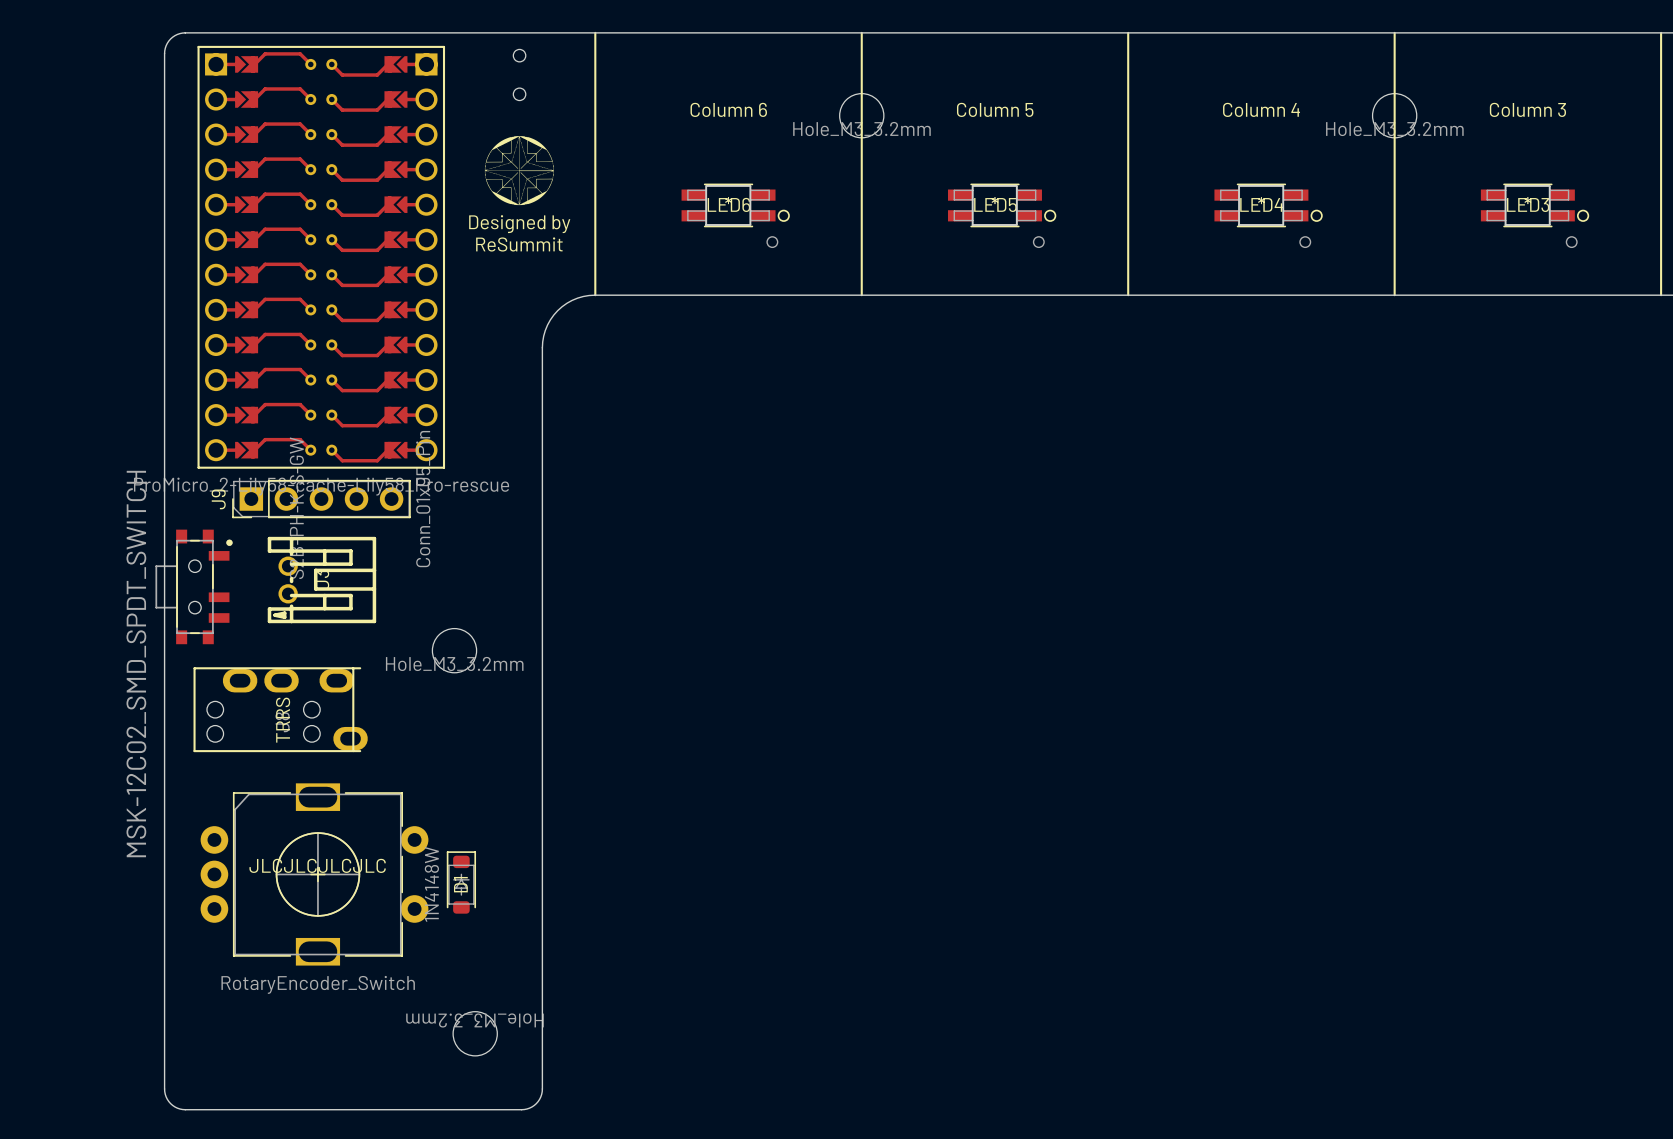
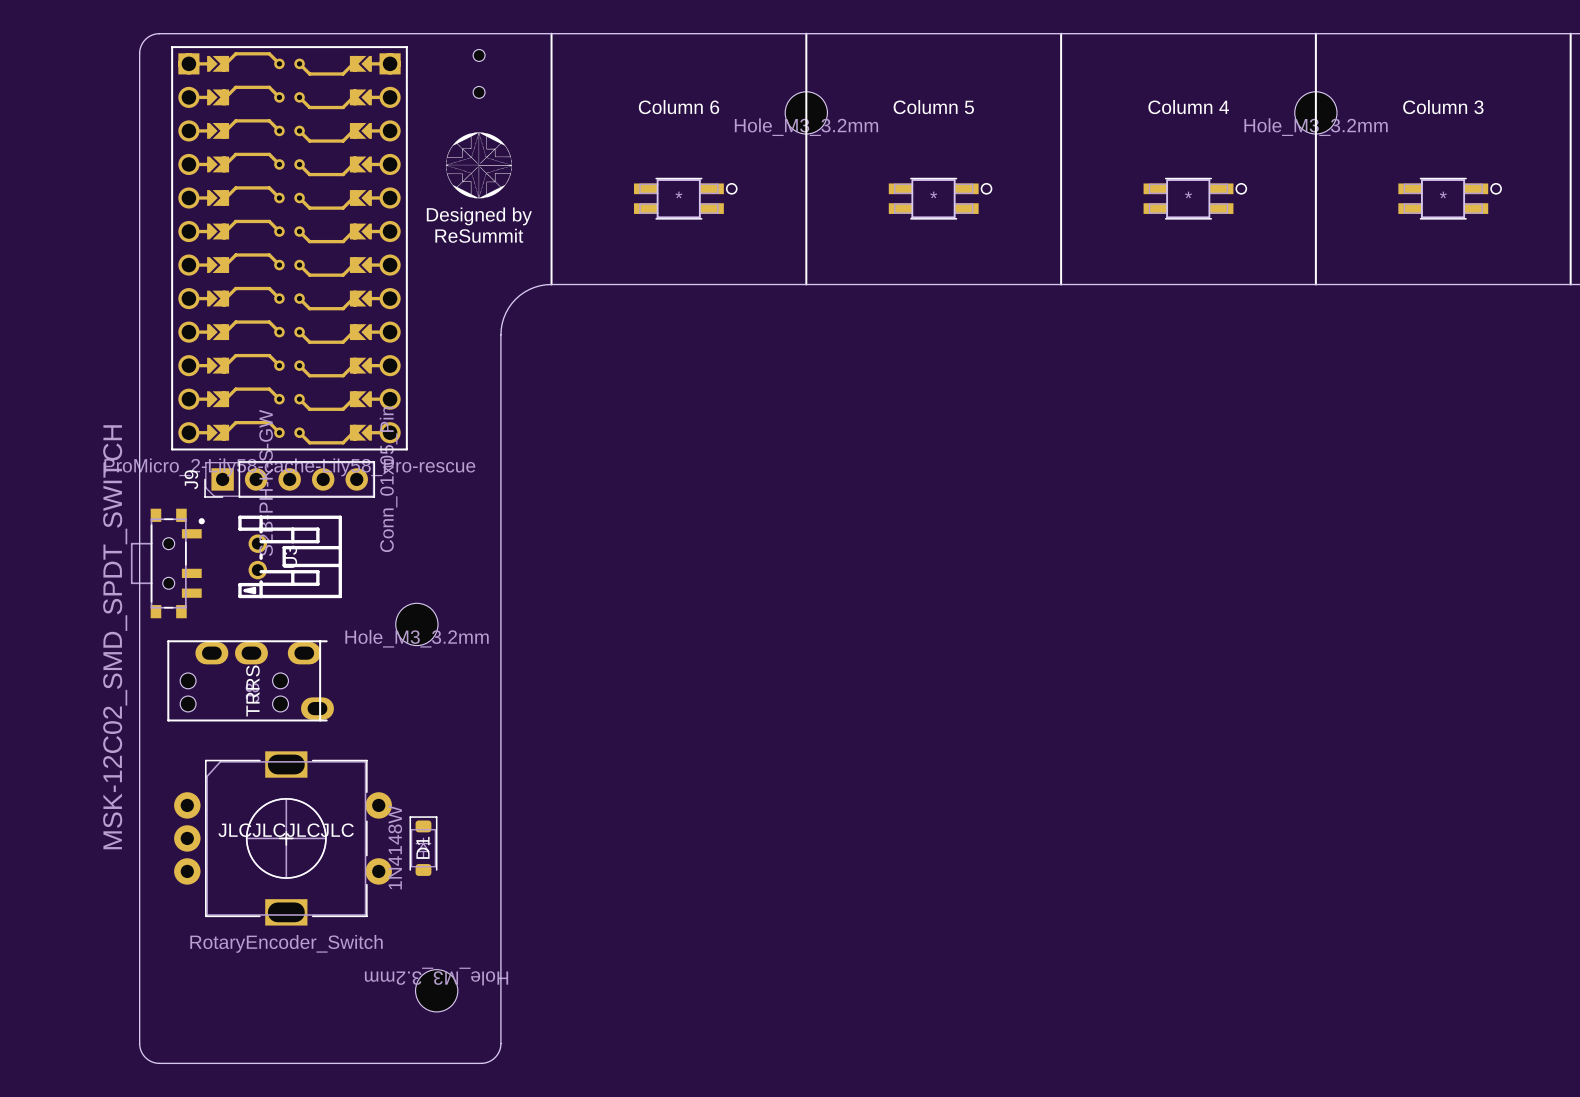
LED6 side: bottom (735, 215) -> top (685, 198)
LED5 side: bottom (1002, 215) -> top (940, 198)
LED4 side: bottom (1268, 215) -> top (1195, 198)
LED3 side: bottom (1535, 215) -> top (1450, 198)

